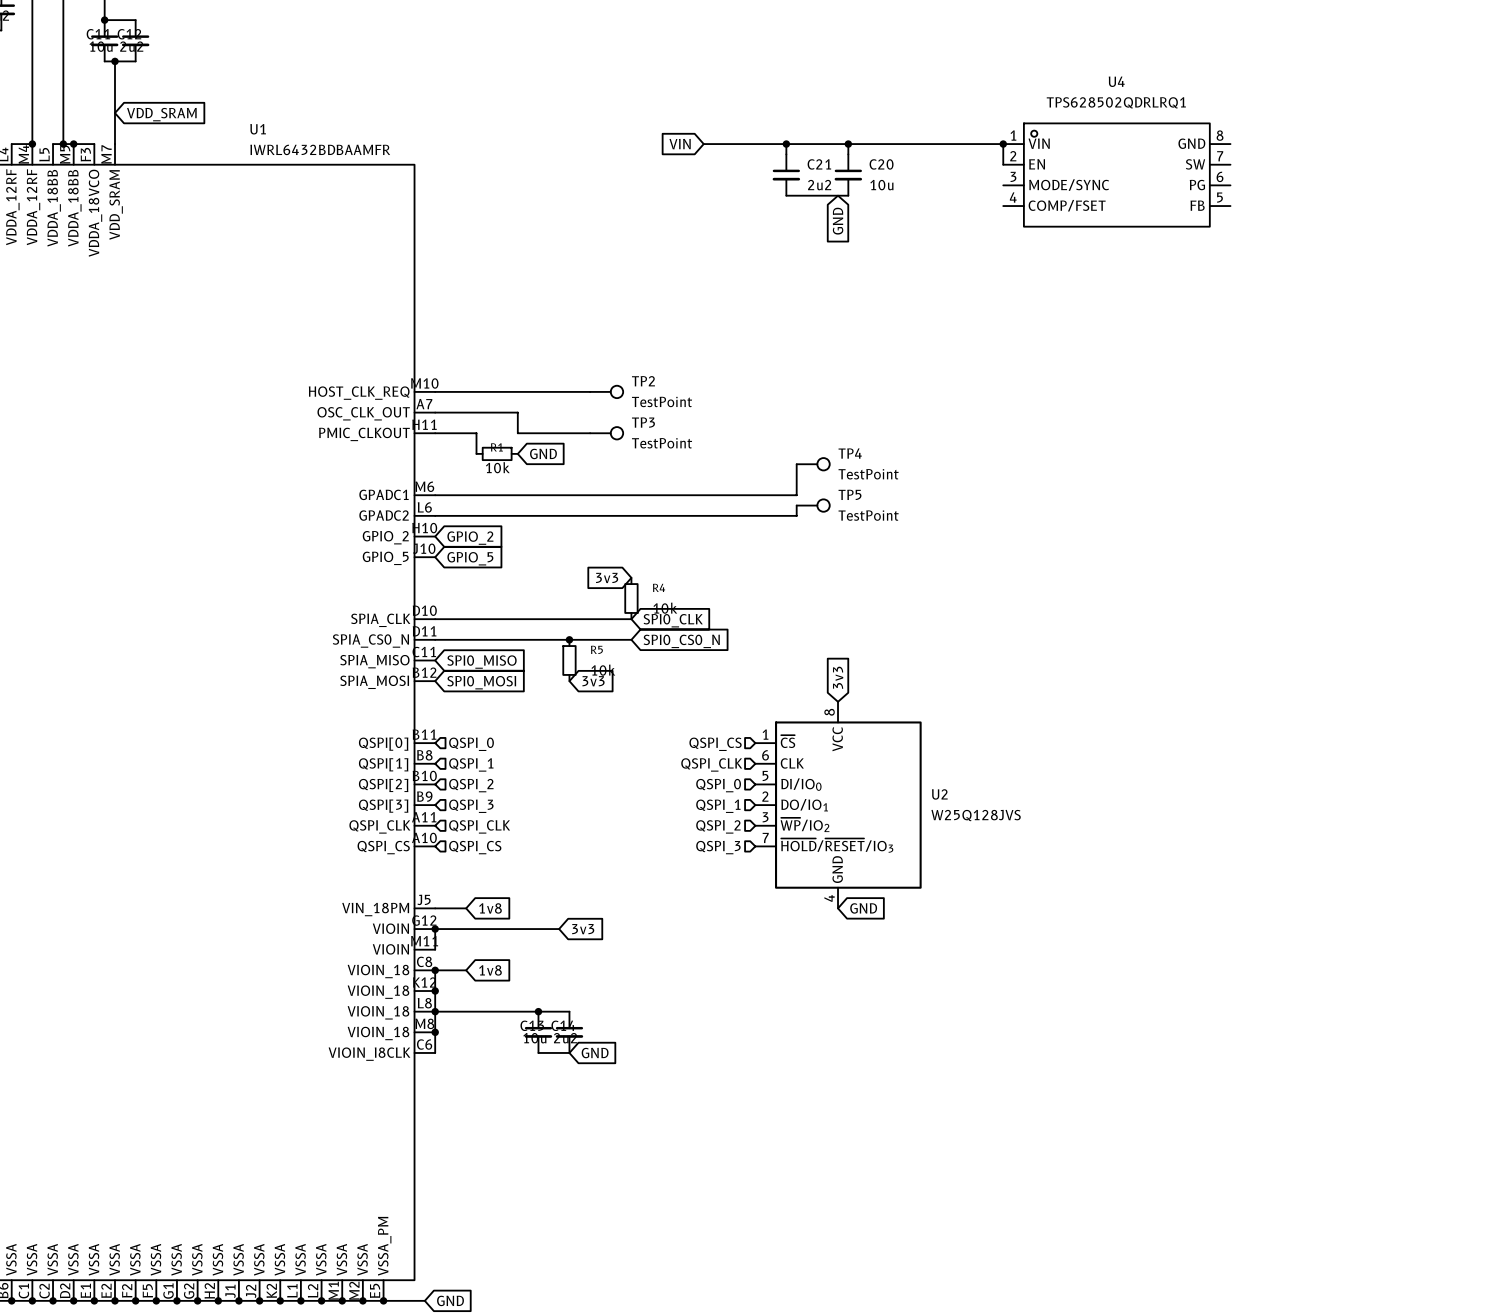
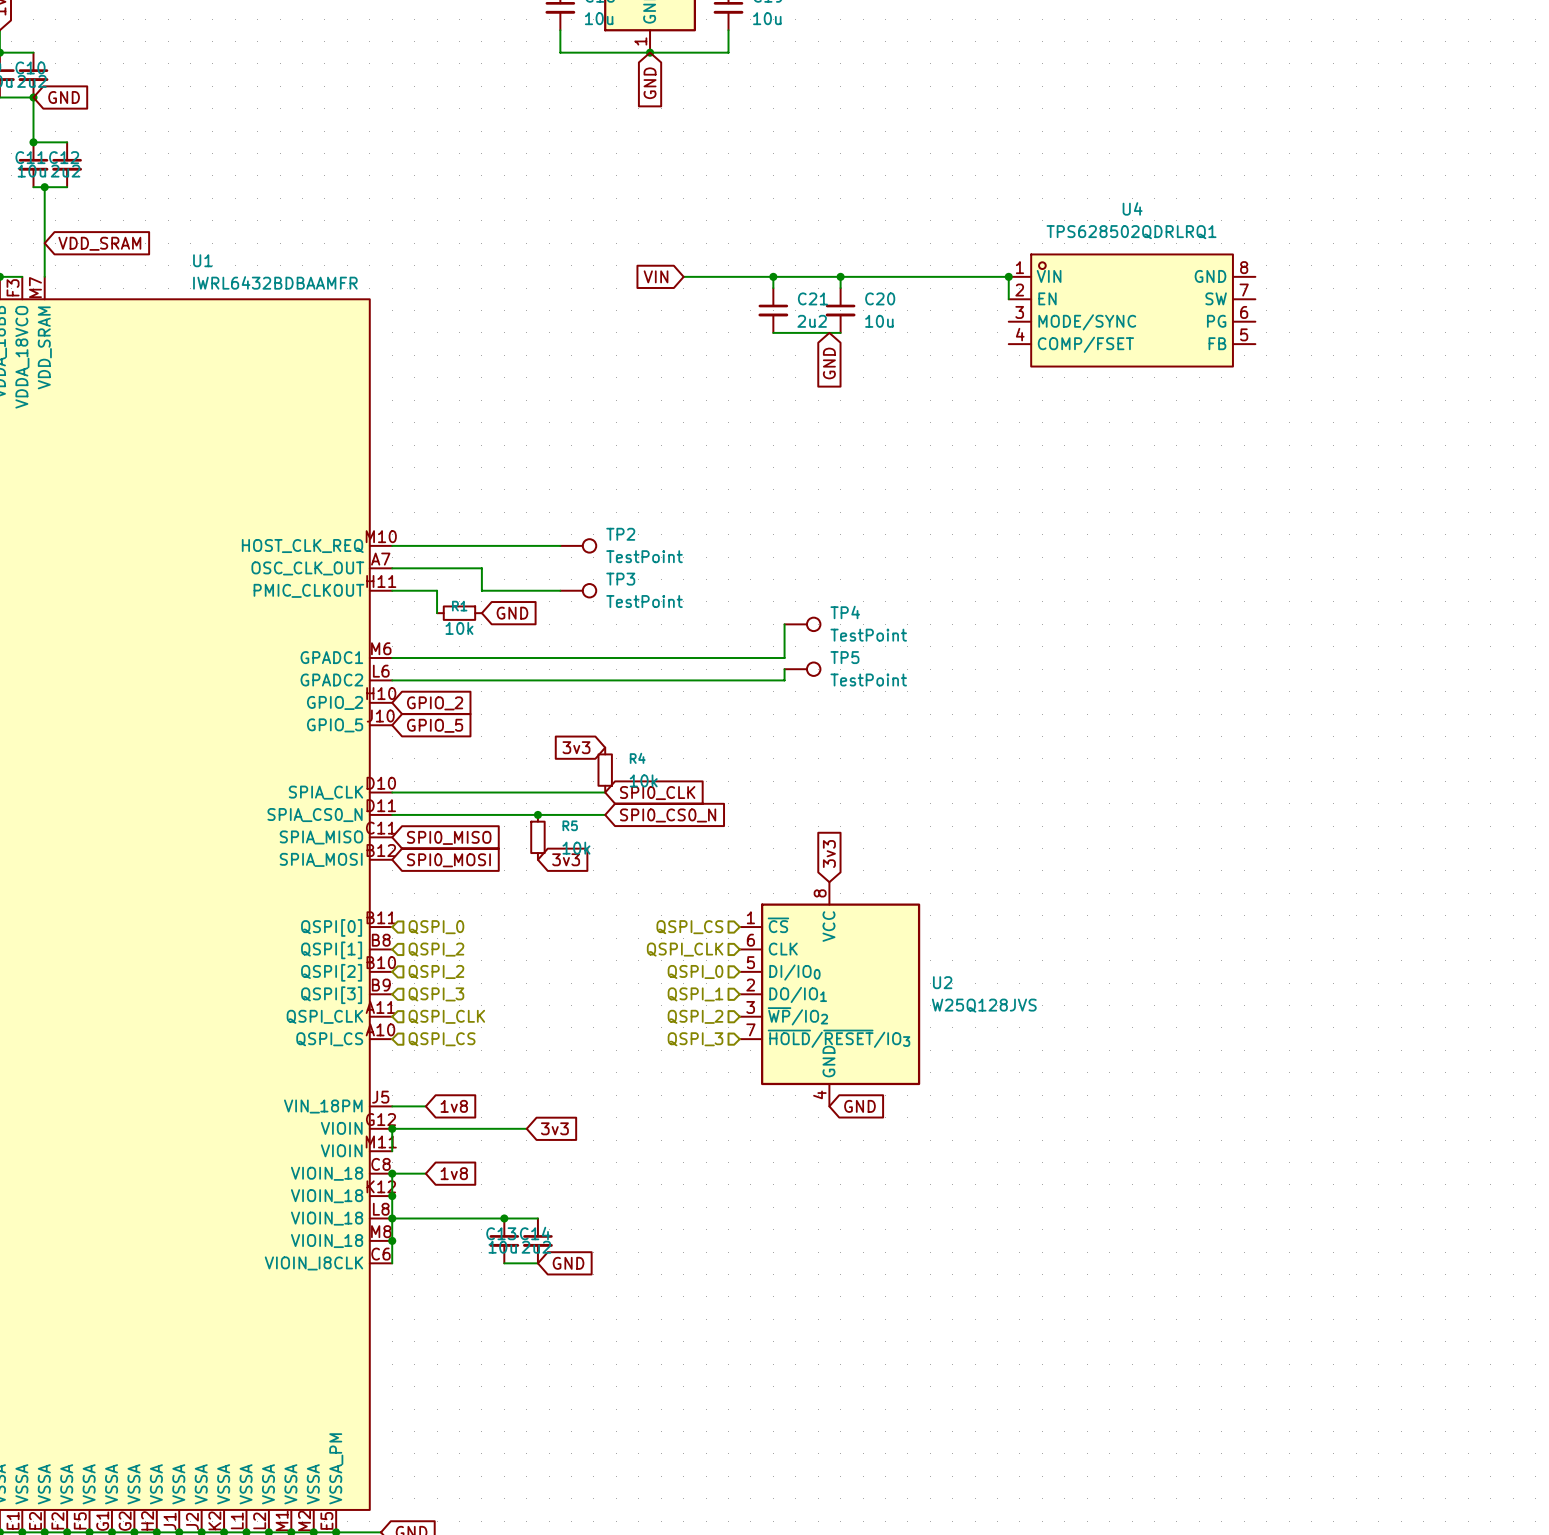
hierarchical label: QSPI_1 (471, 764) -> QSPI_2 (436, 949)

